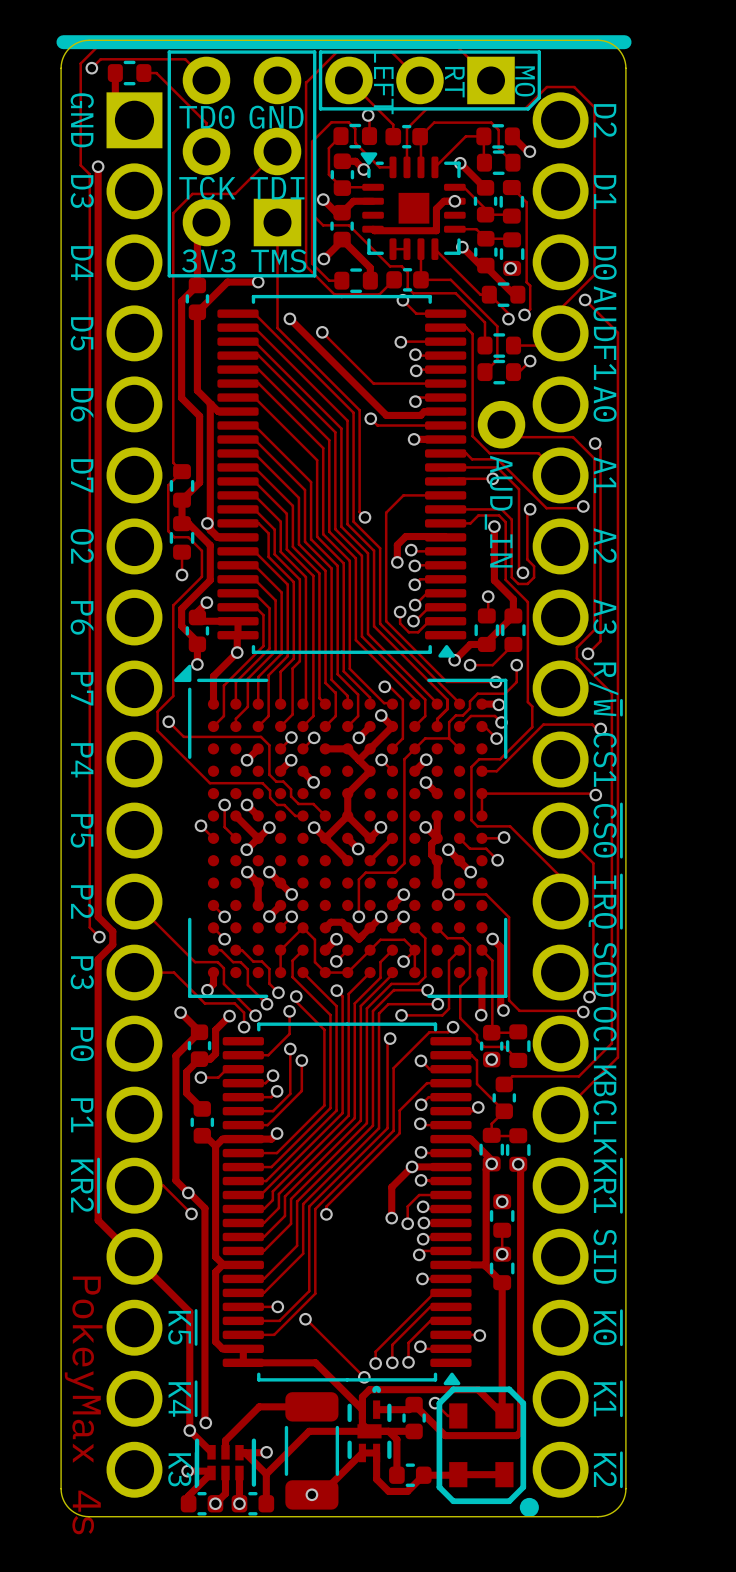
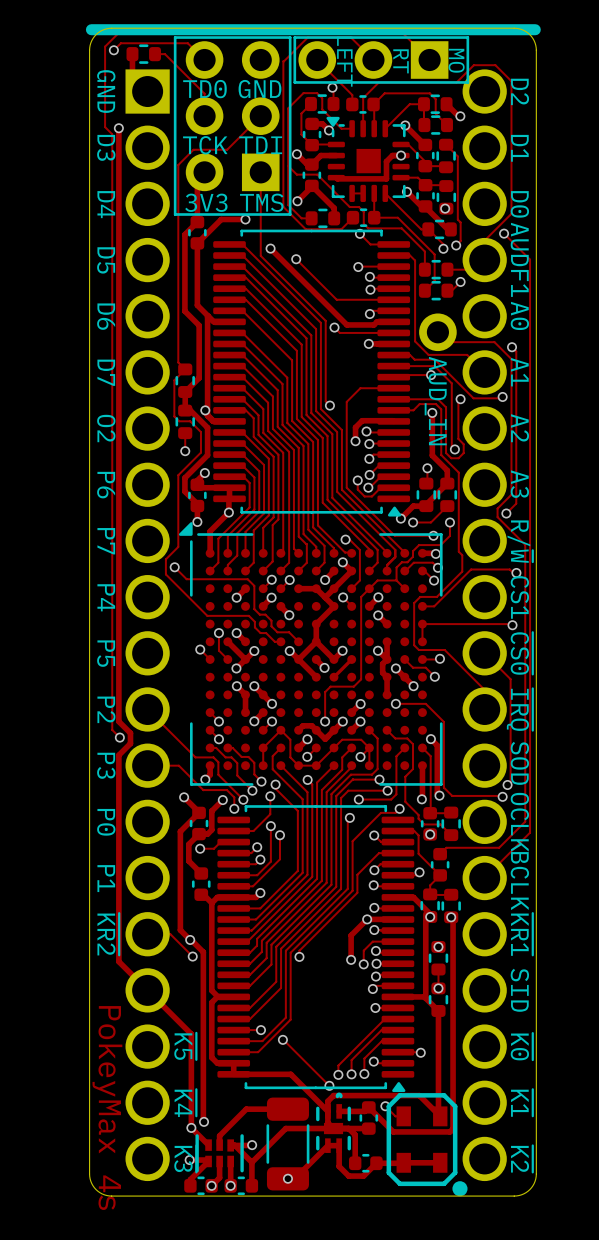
part footprint: [318, 50, 541, 111] -> [293, 36, 470, 84]

